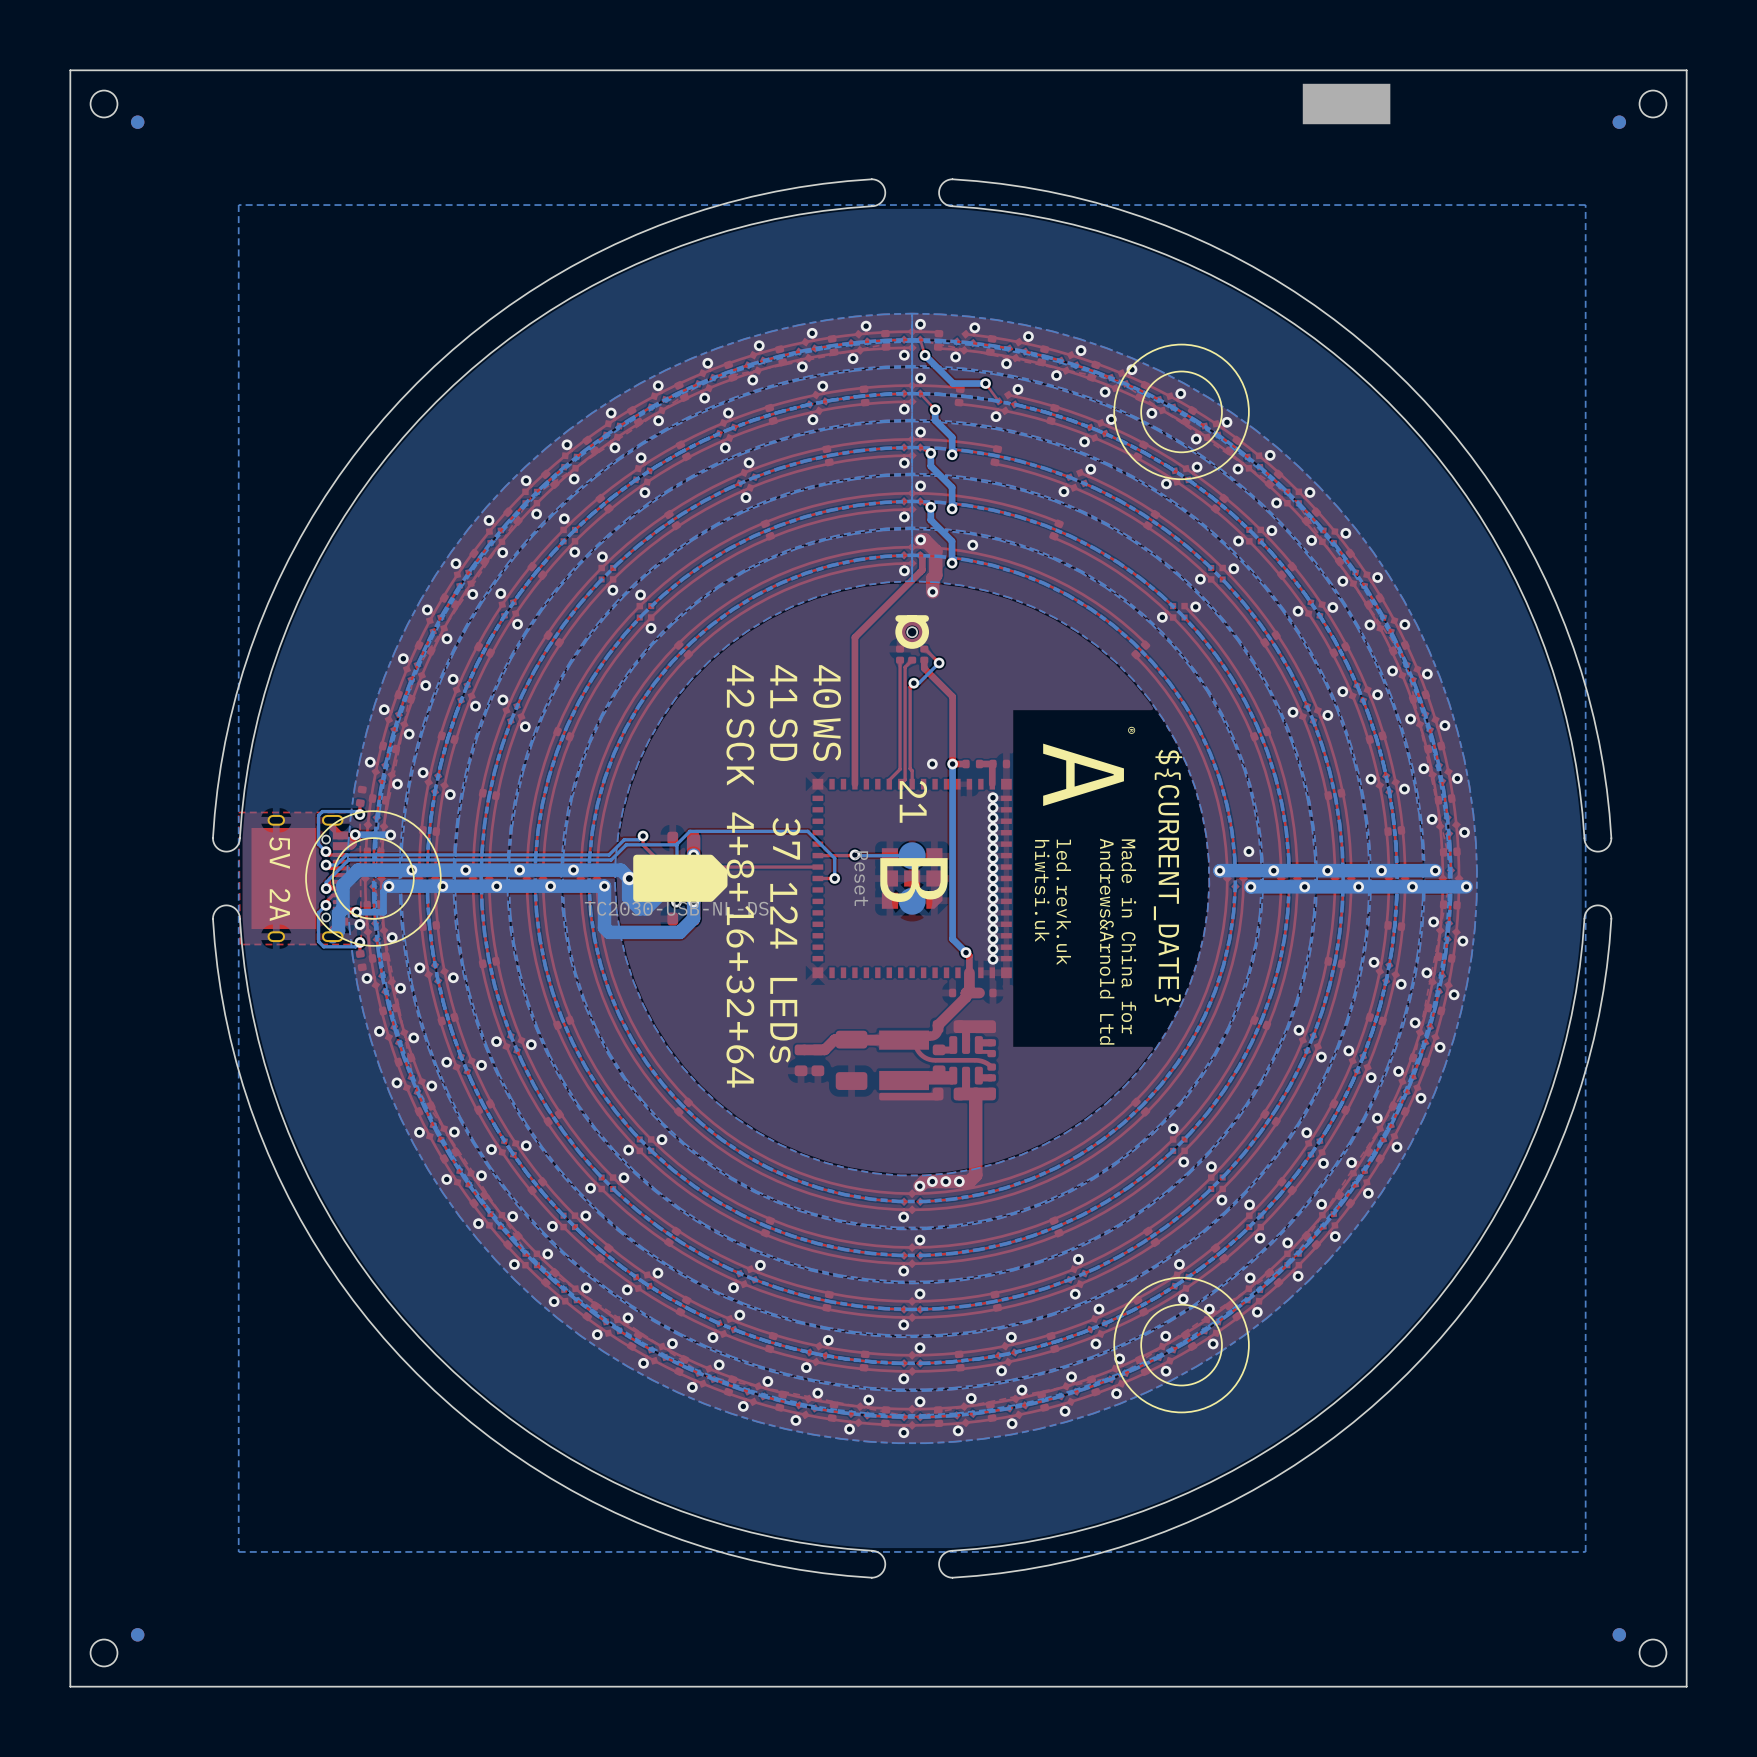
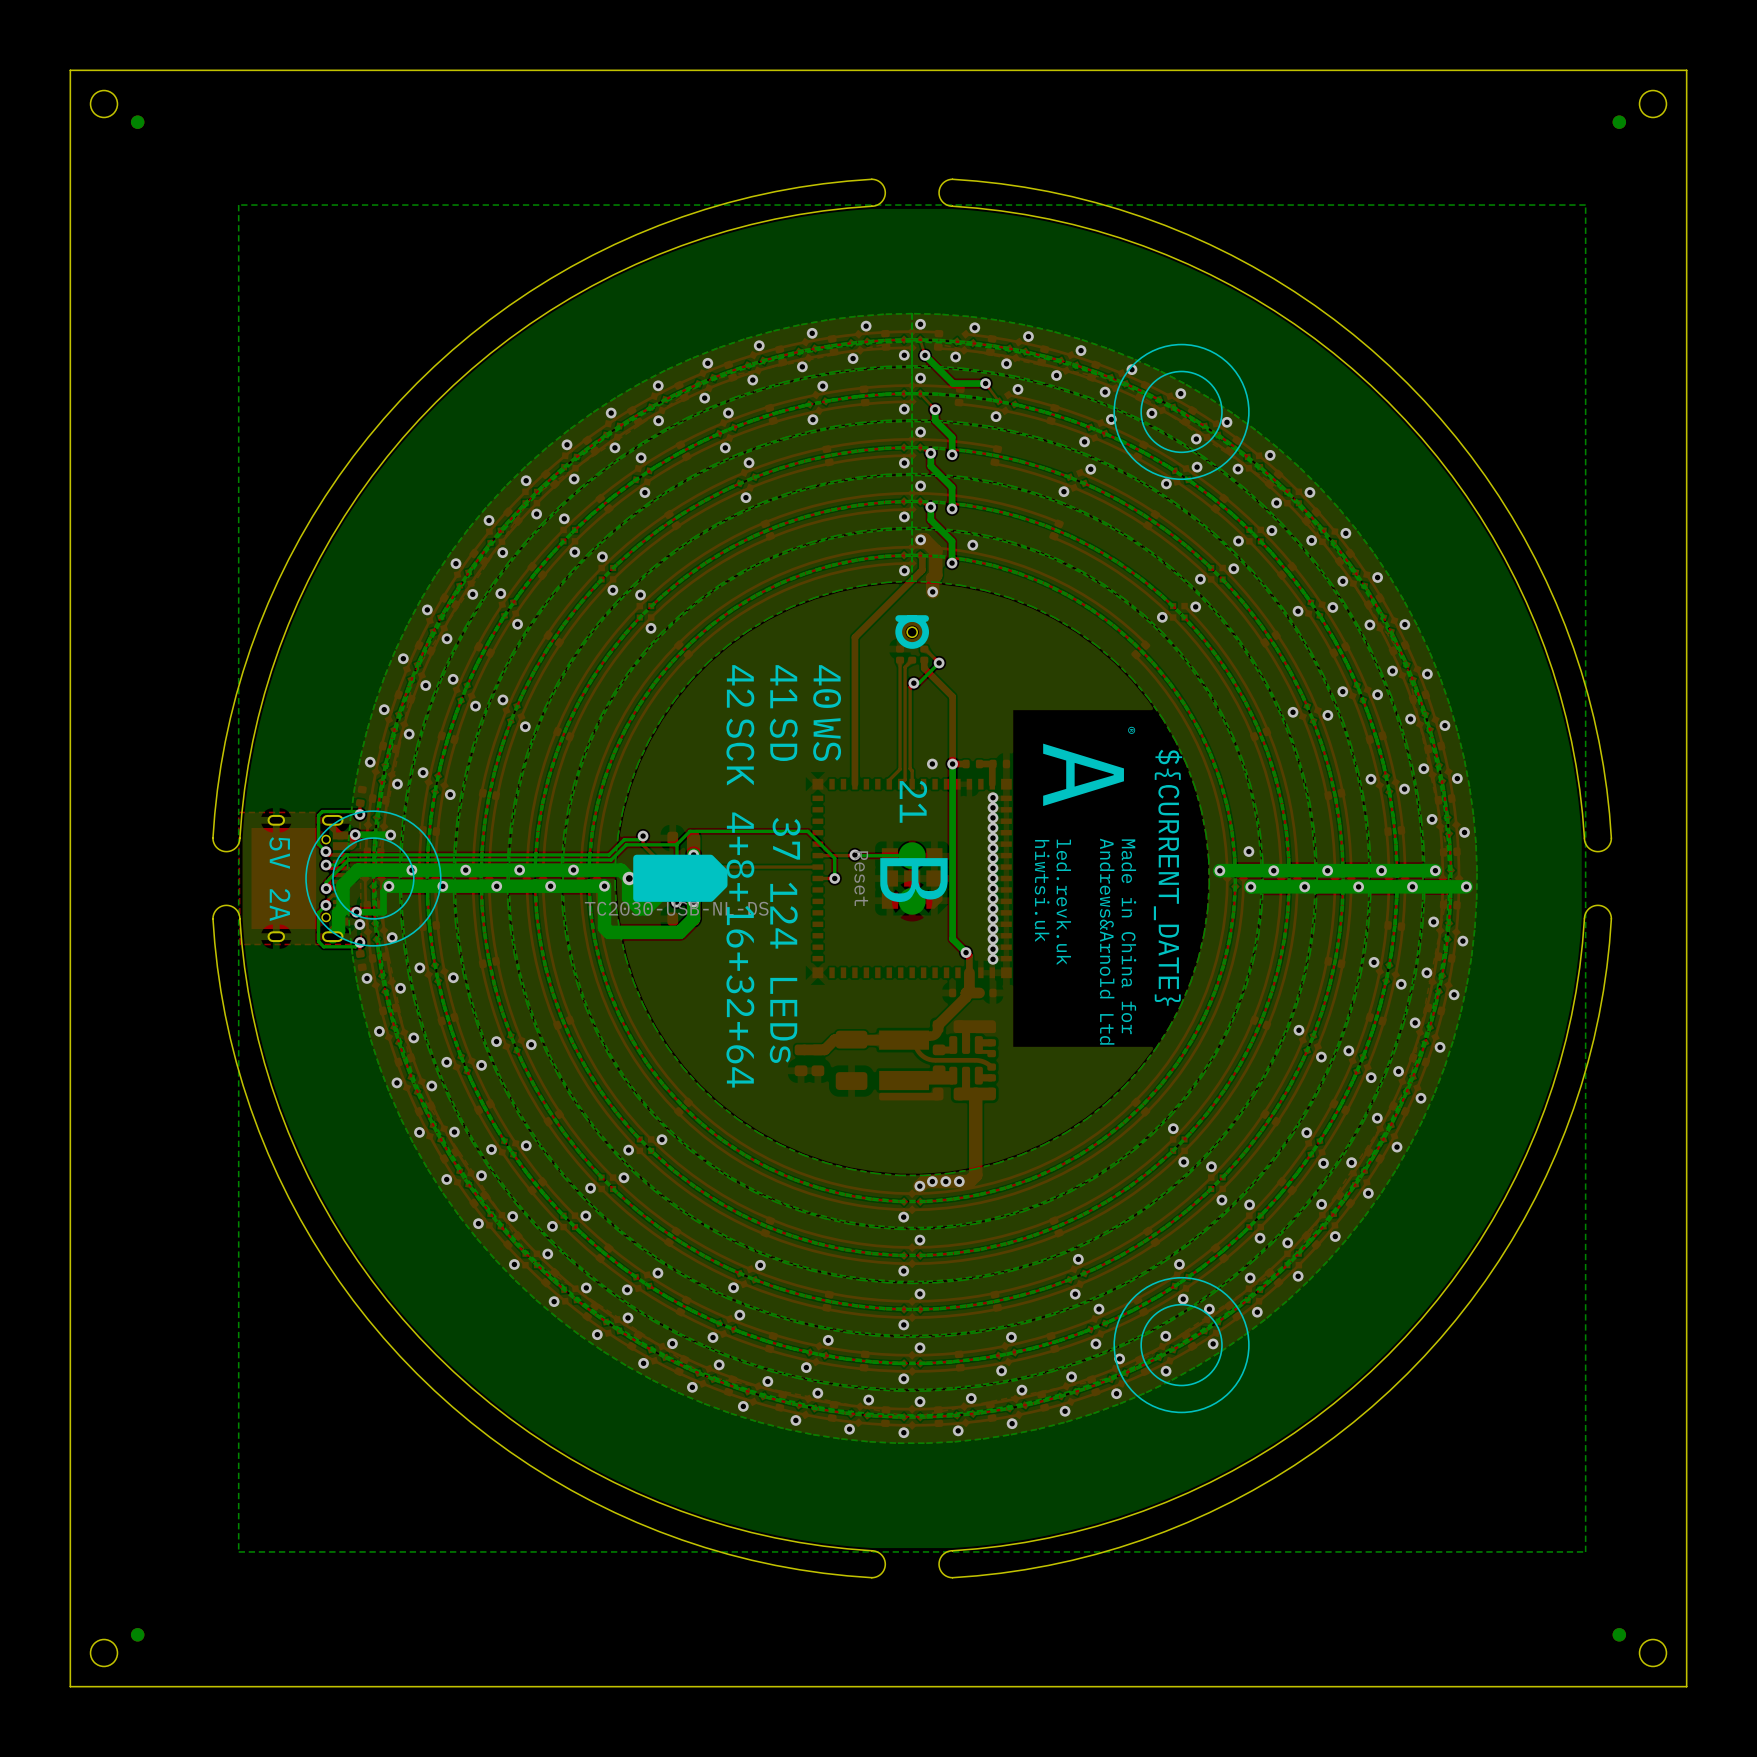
part footprint: [69, 69, 1688, 1688] -> [69, 69, 1688, 1688]

